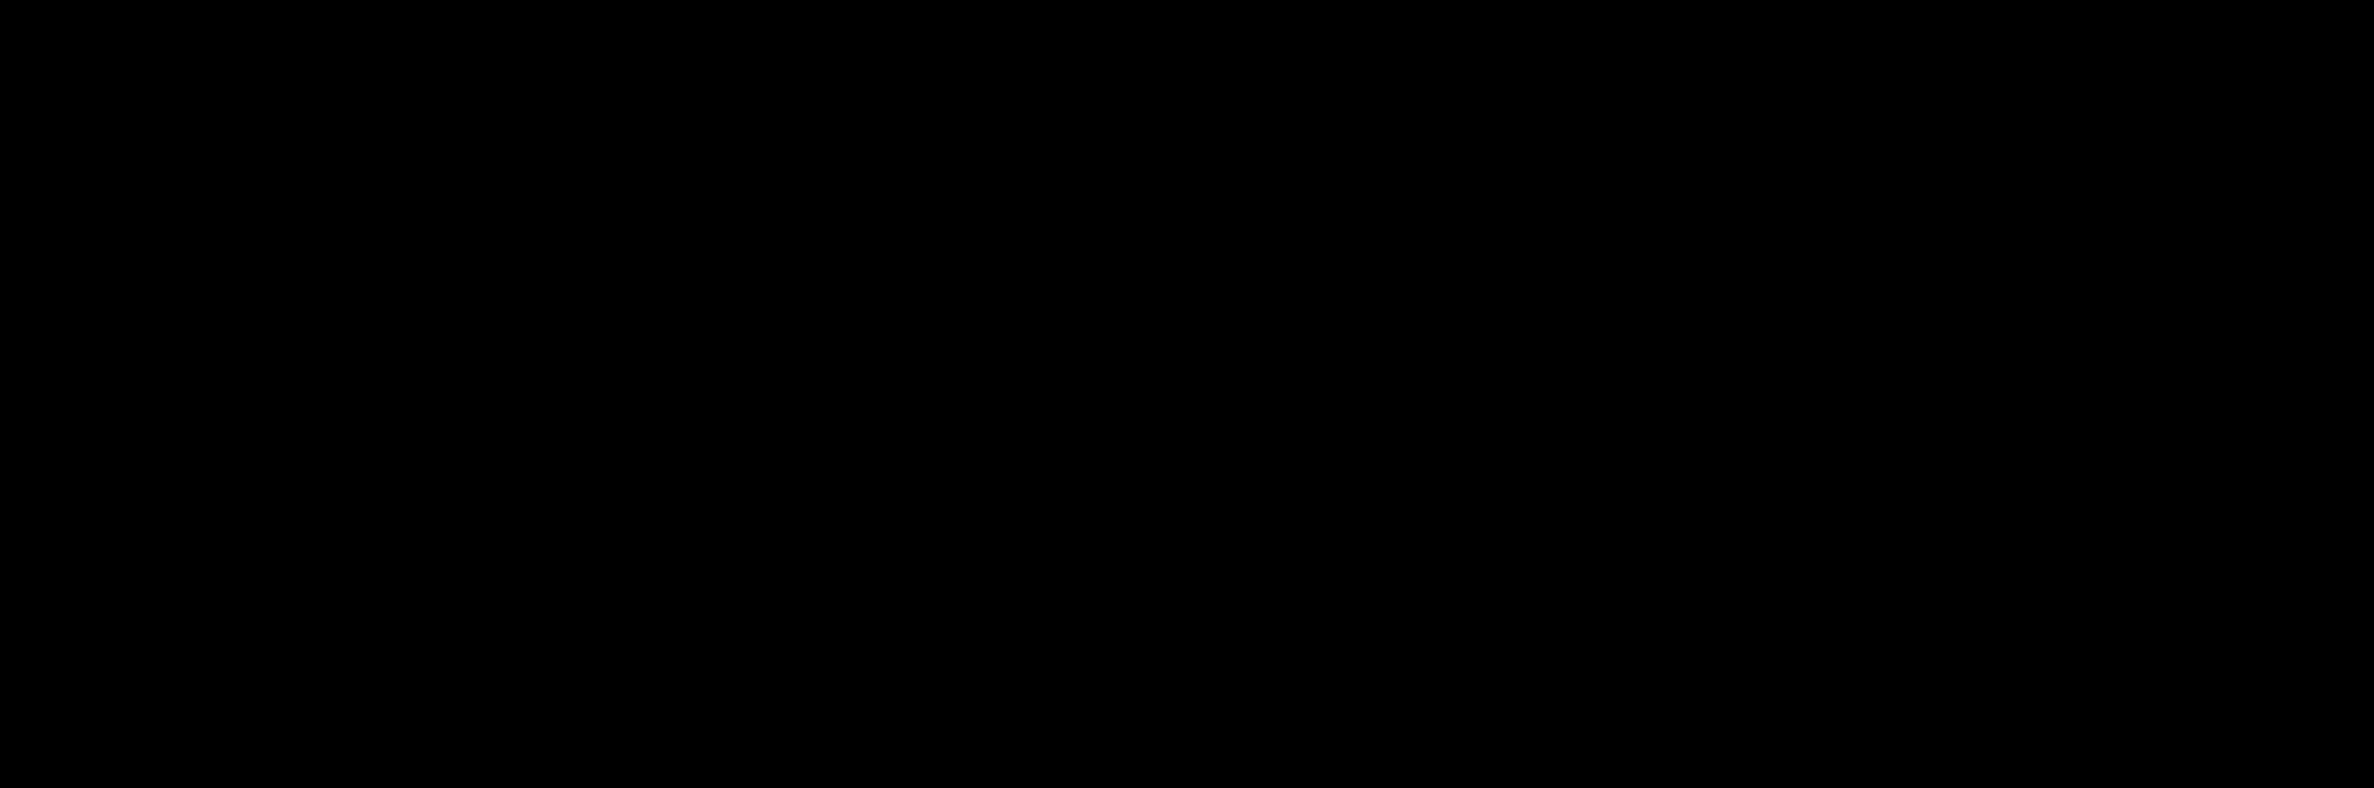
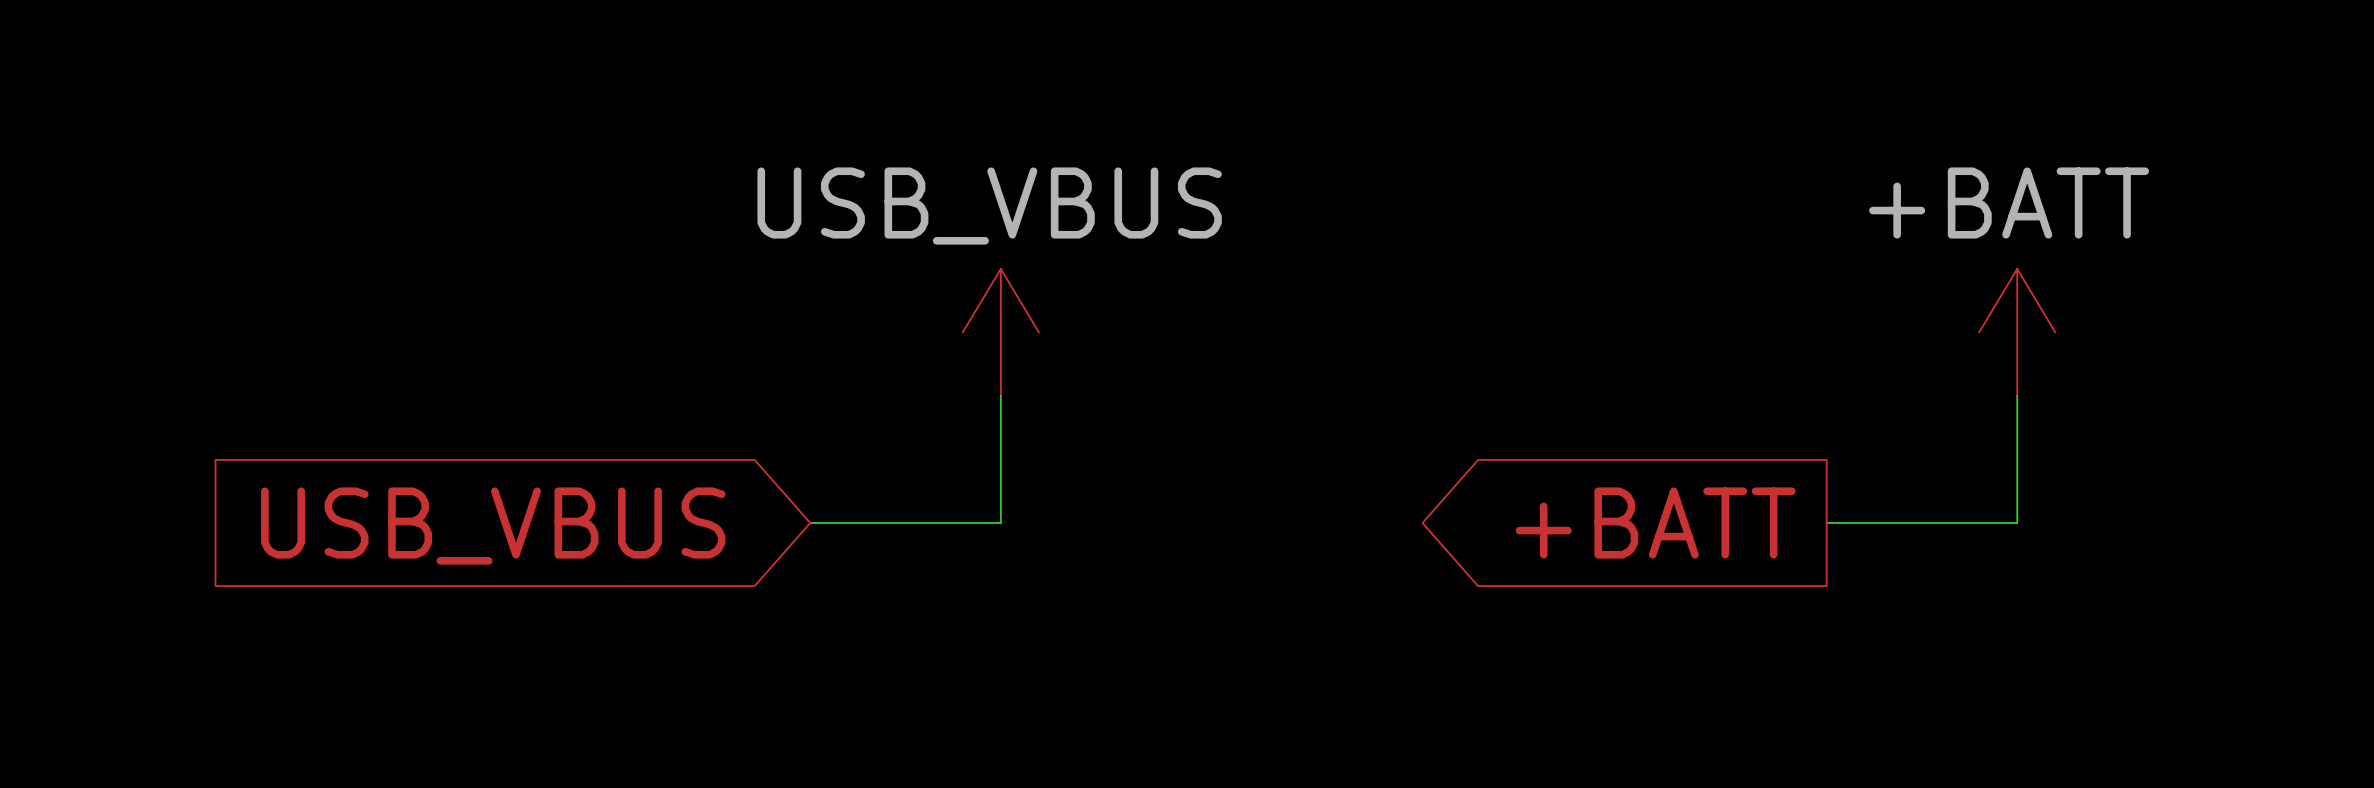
power symbol: none -> USB_VBUS (1000, 332)
power symbol: none -> +BATT (2017, 332)
wire: none -> (1000, 395) (1000, 523) (810, 523)
wire: none -> (2017, 395) (2017, 523) (1826, 523)
global label: none -> +BATT (1655, 523)
global label: none -> USB_VBUS (493, 526)

